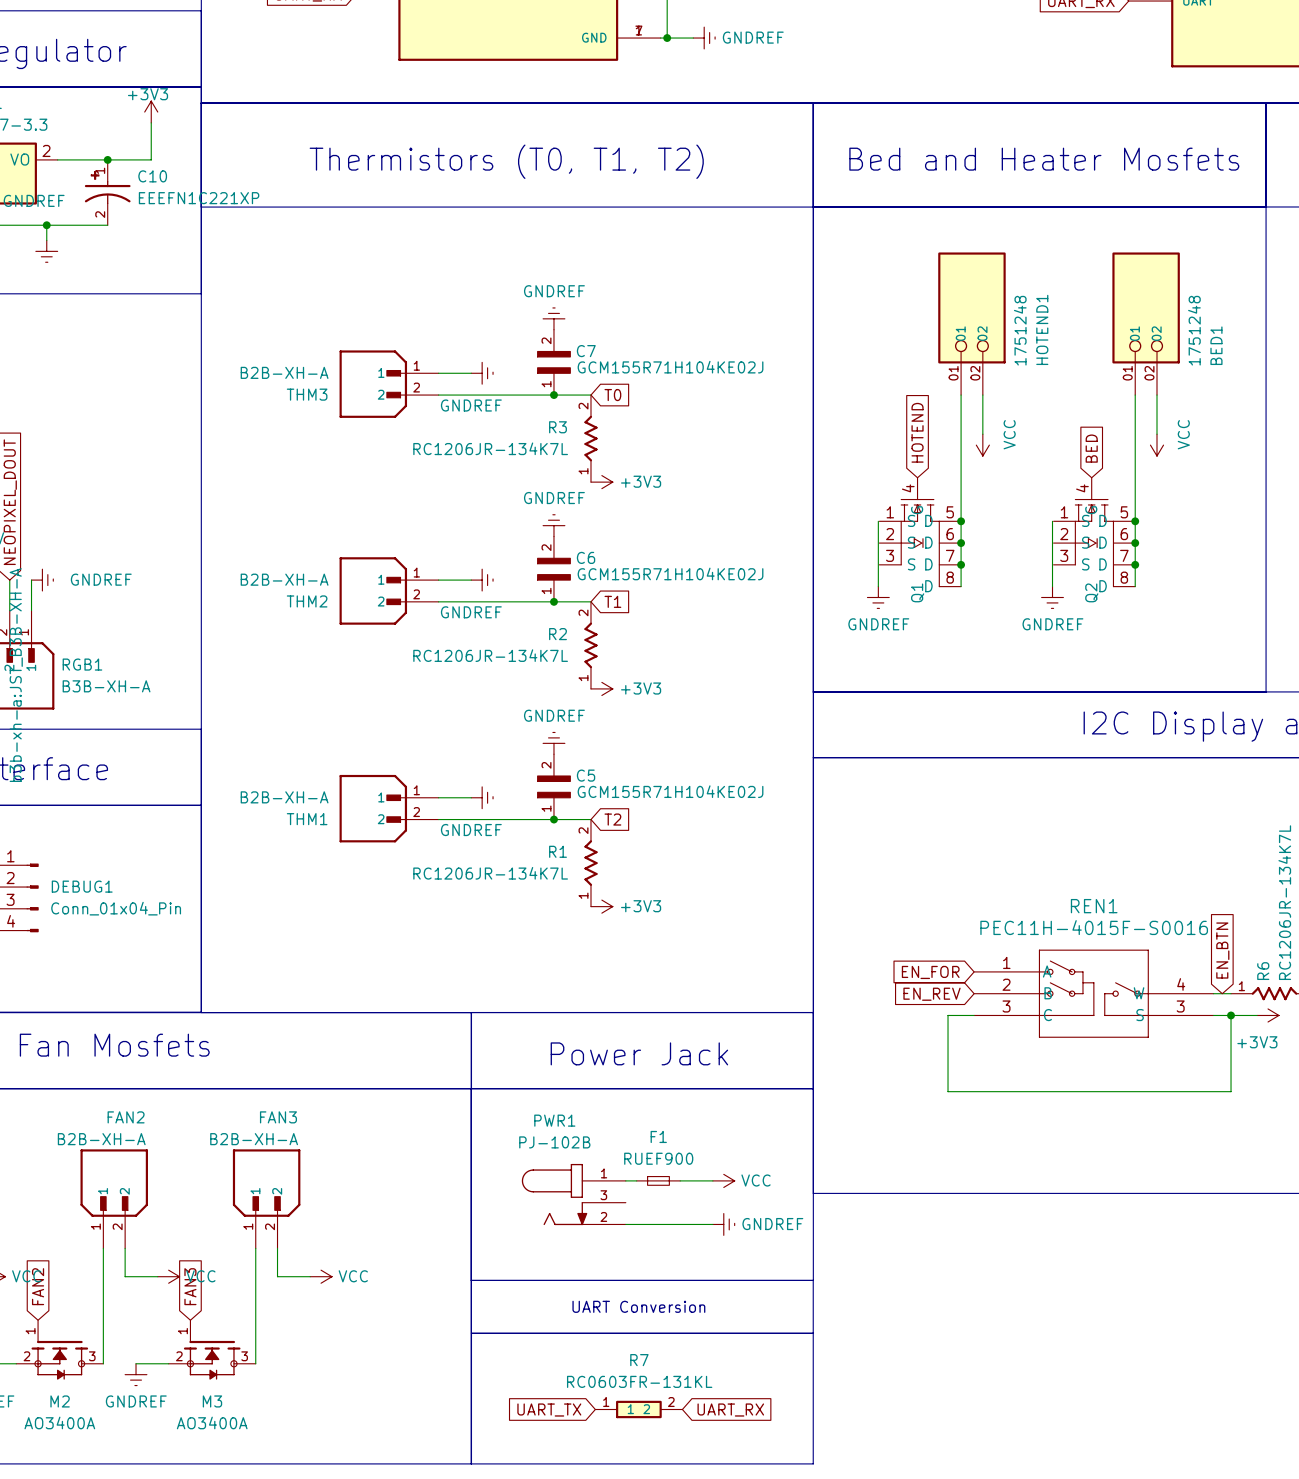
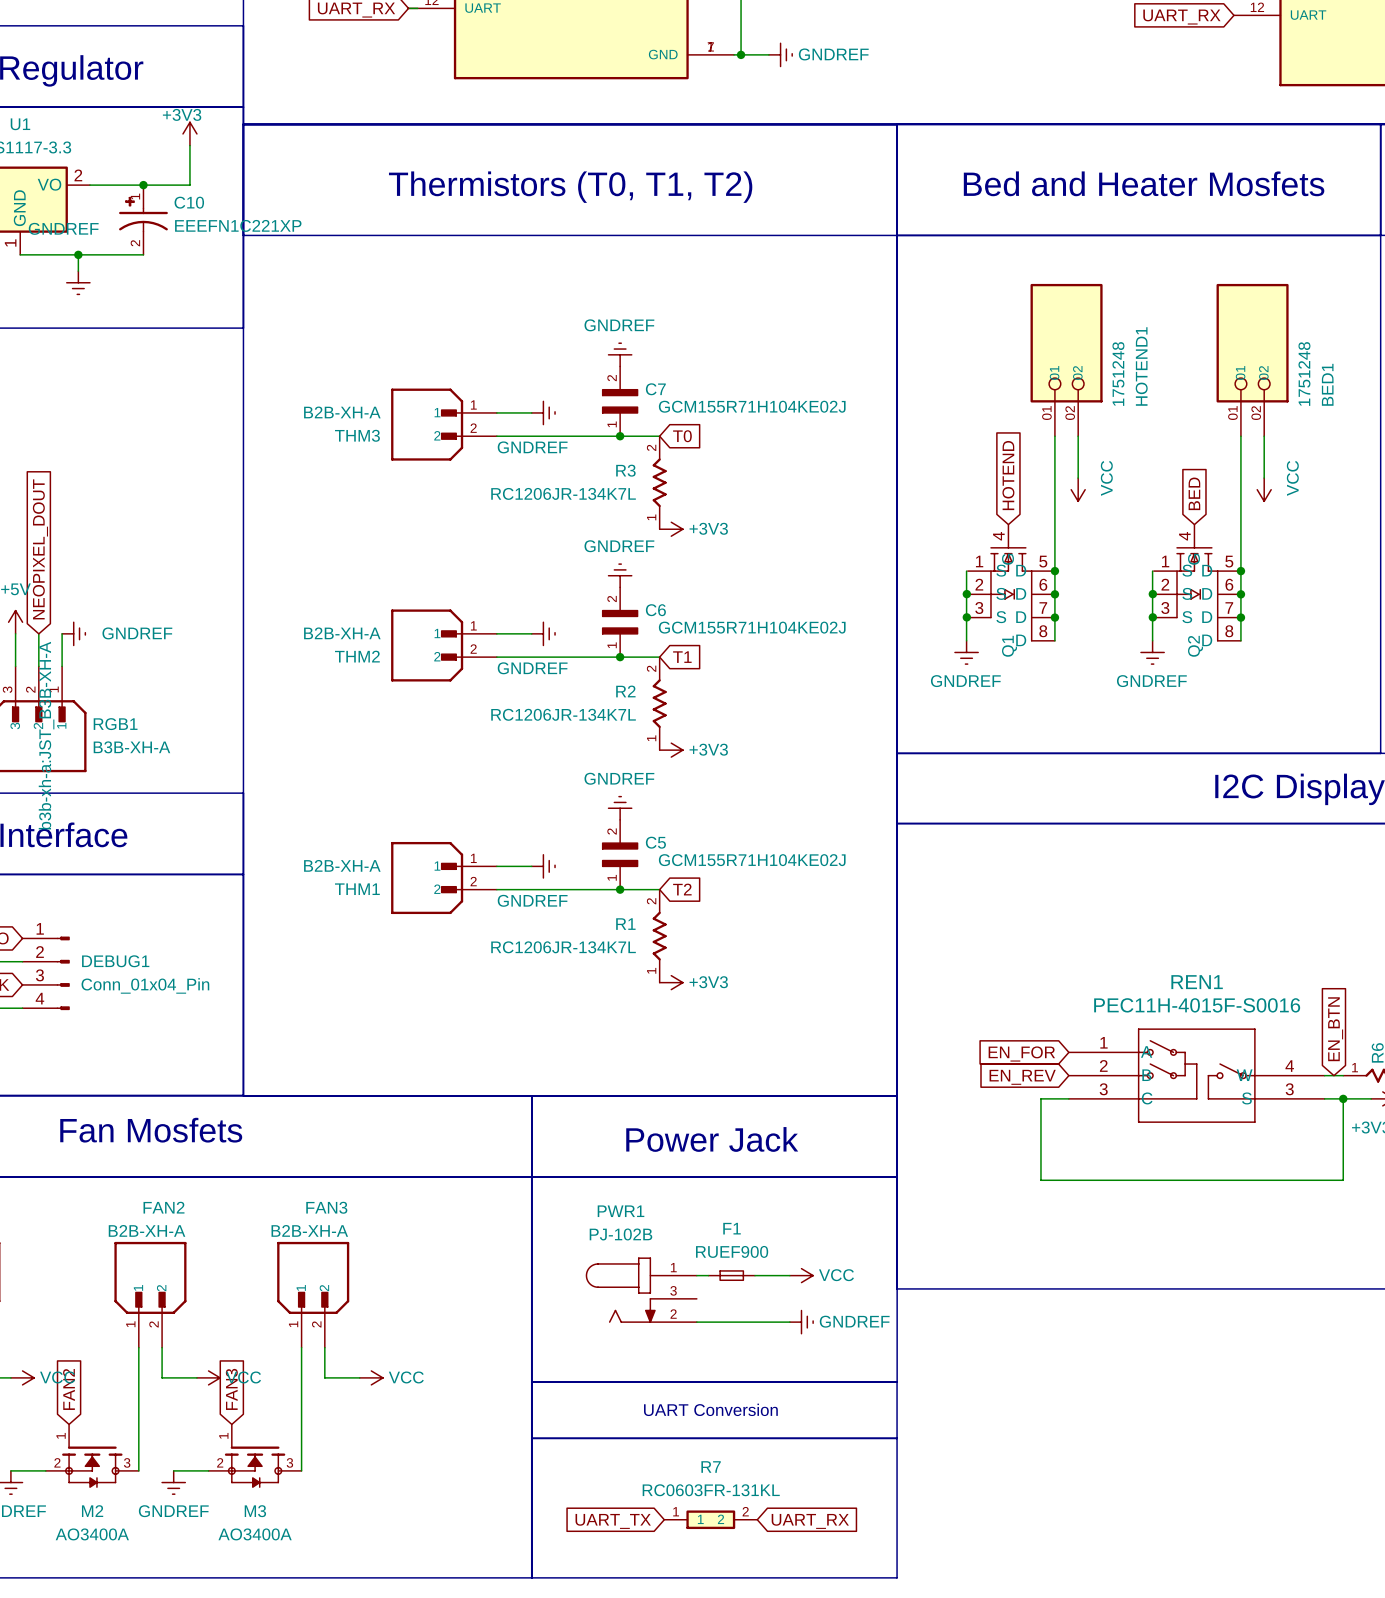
junction: none -> (966, 594)
junction: none -> (1152, 594)
junction: none -> (966, 617)
junction: none -> (1152, 617)

